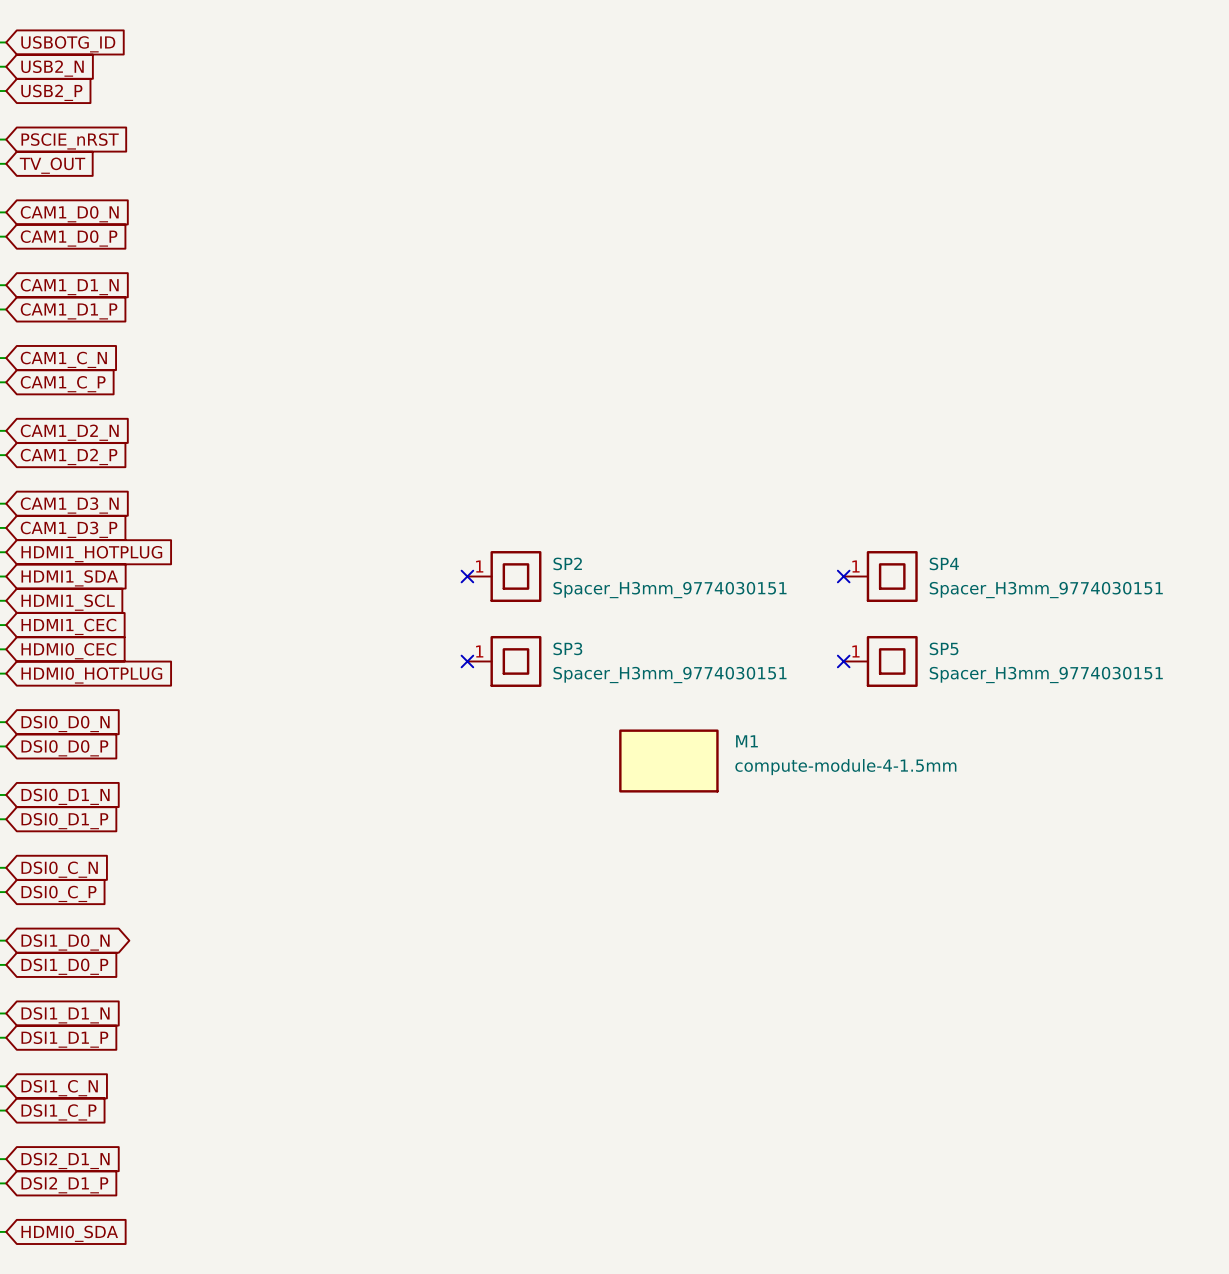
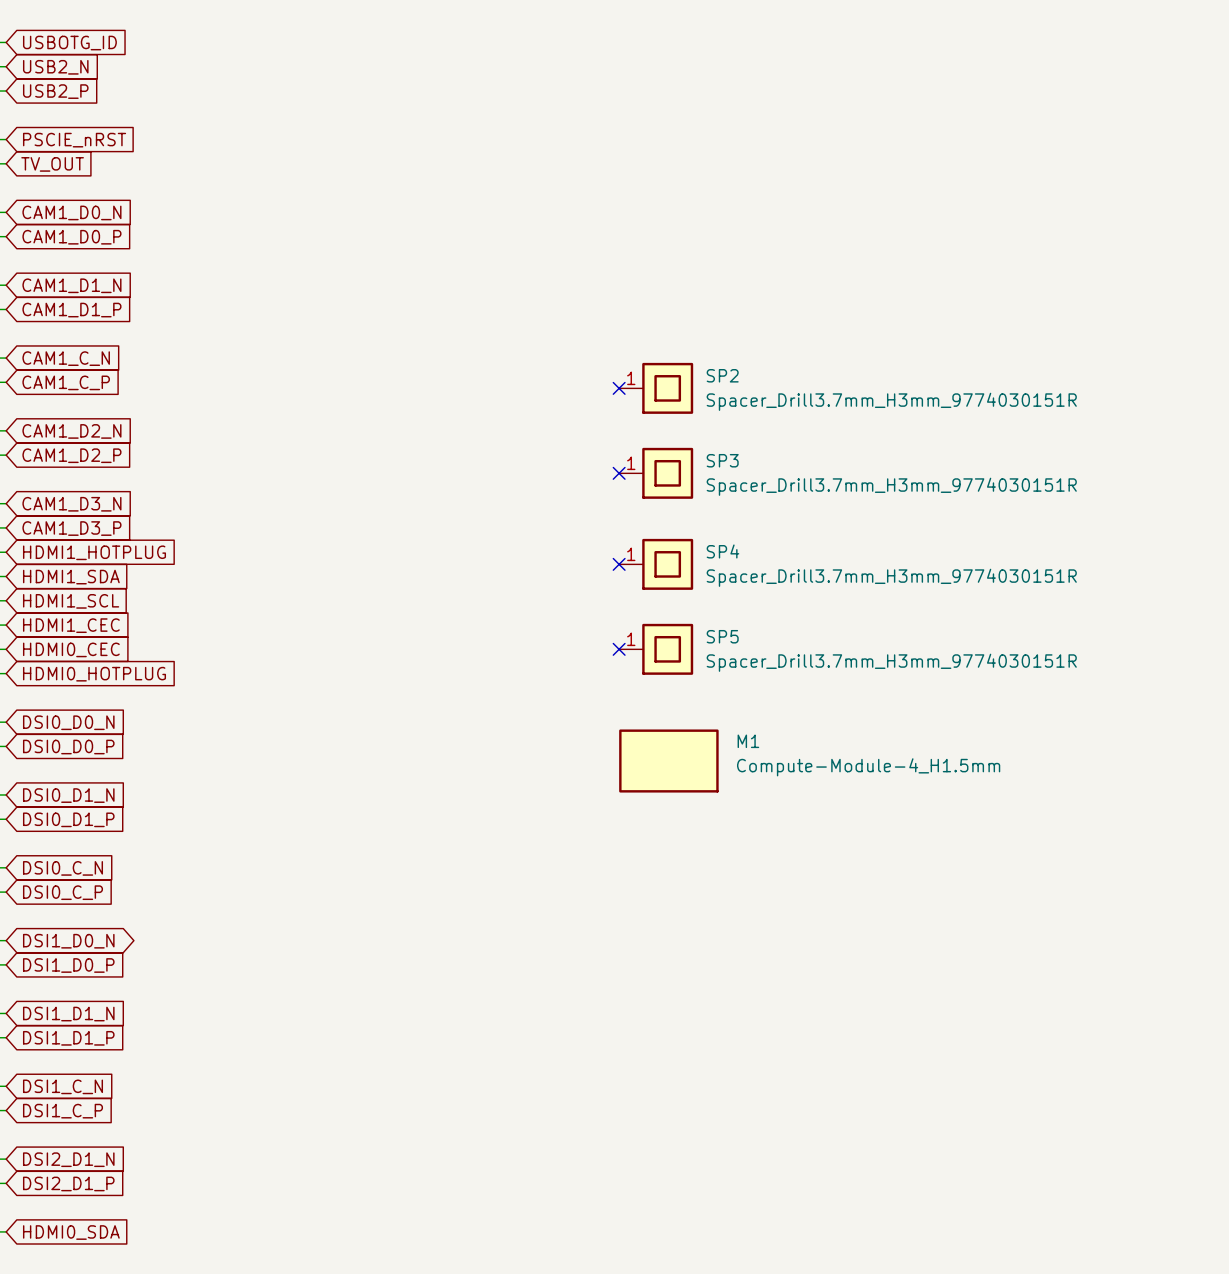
no-connect mark: none -> (619, 388)
no-connect mark: none -> (619, 473)
SP2 symbol: [467, 551, 542, 603] -> [619, 362, 694, 414]
SP4 symbol: [843, 551, 918, 603] -> [619, 538, 694, 590]
no-connect mark: none -> (619, 564)
no-connect mark: (467, 576) -> none
no-connect mark: (843, 576) -> none
SP2 value: Spacer_H3mm_9774030151 (670, 590) -> Spacer_Drill3.7mm_H3mm_9774030151R (891, 401)
SP4 value: Spacer_H3mm_9774030151 (1046, 590) -> Spacer_Drill3.7mm_H3mm_9774030151R (891, 577)
SP3 symbol: [467, 635, 542, 687] -> [619, 447, 694, 499]
SP5 symbol: [843, 635, 918, 687] -> [619, 623, 694, 675]
no-connect mark: none -> (619, 649)
no-connect mark: (467, 661) -> none
no-connect mark: (843, 661) -> none
SP3 value: Spacer_H3mm_9774030151 (670, 675) -> Spacer_Drill3.7mm_H3mm_9774030151R (891, 486)
SP5 value: Spacer_H3mm_9774030151 (1046, 675) -> Spacer_Drill3.7mm_H3mm_9774030151R (891, 662)
M1 value: compute-module-4-1.5mm (845, 767) -> Compute-Module-4_H1.5mm (868, 767)

